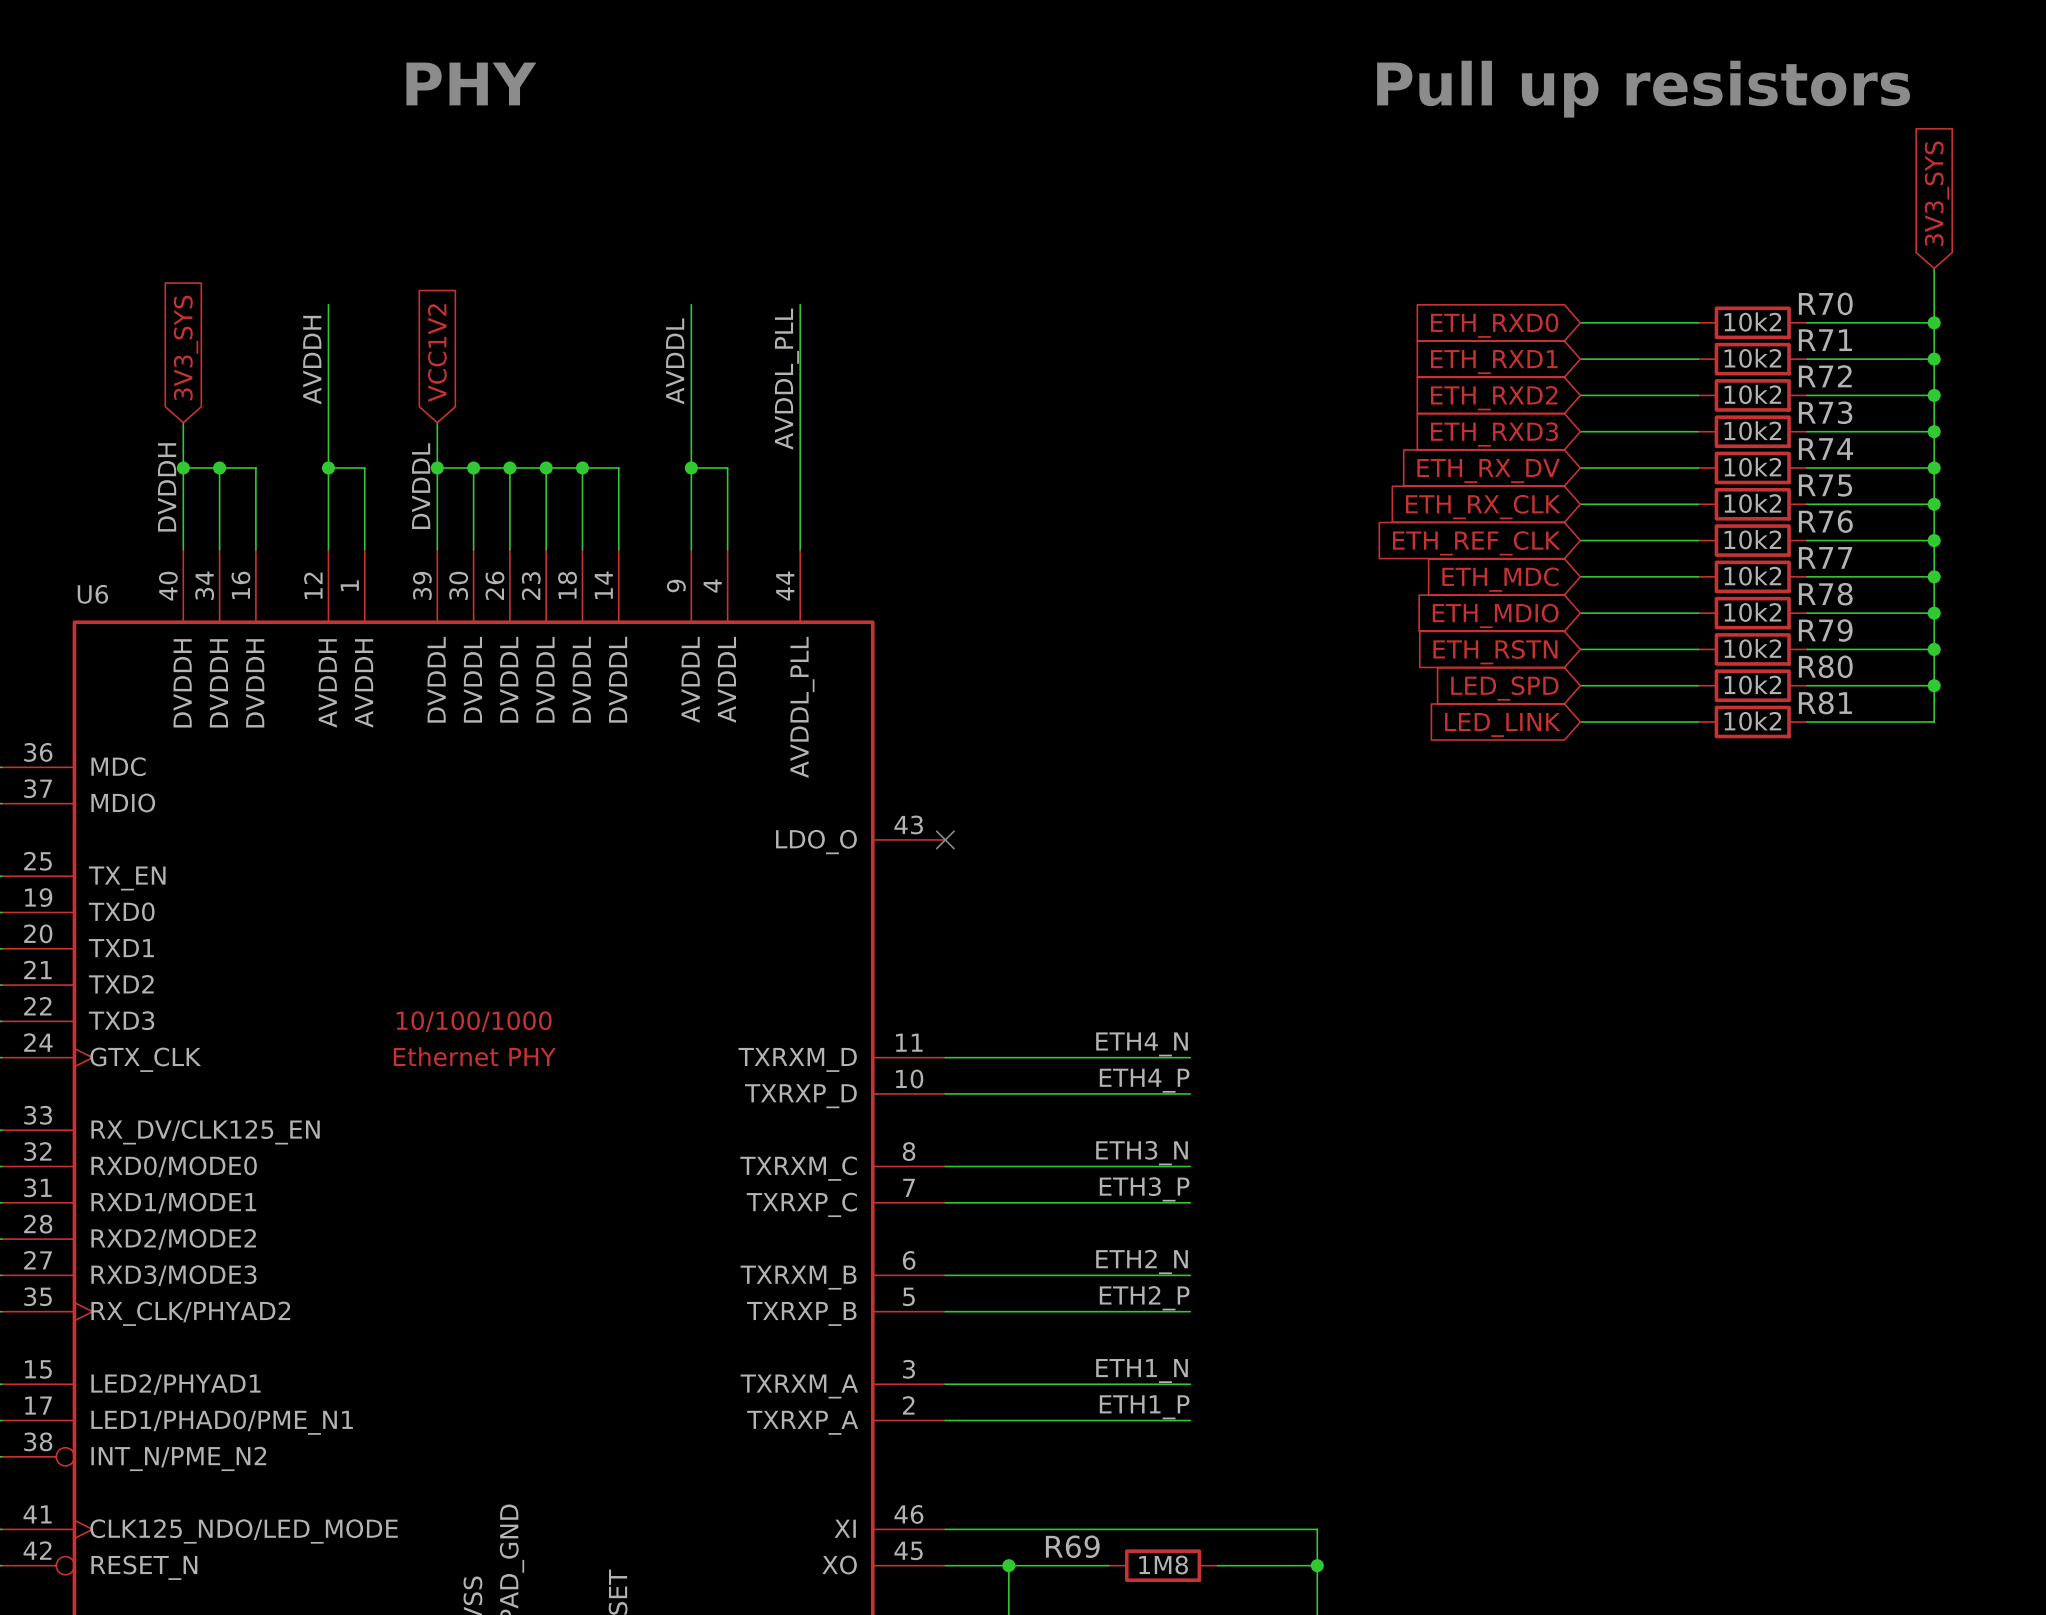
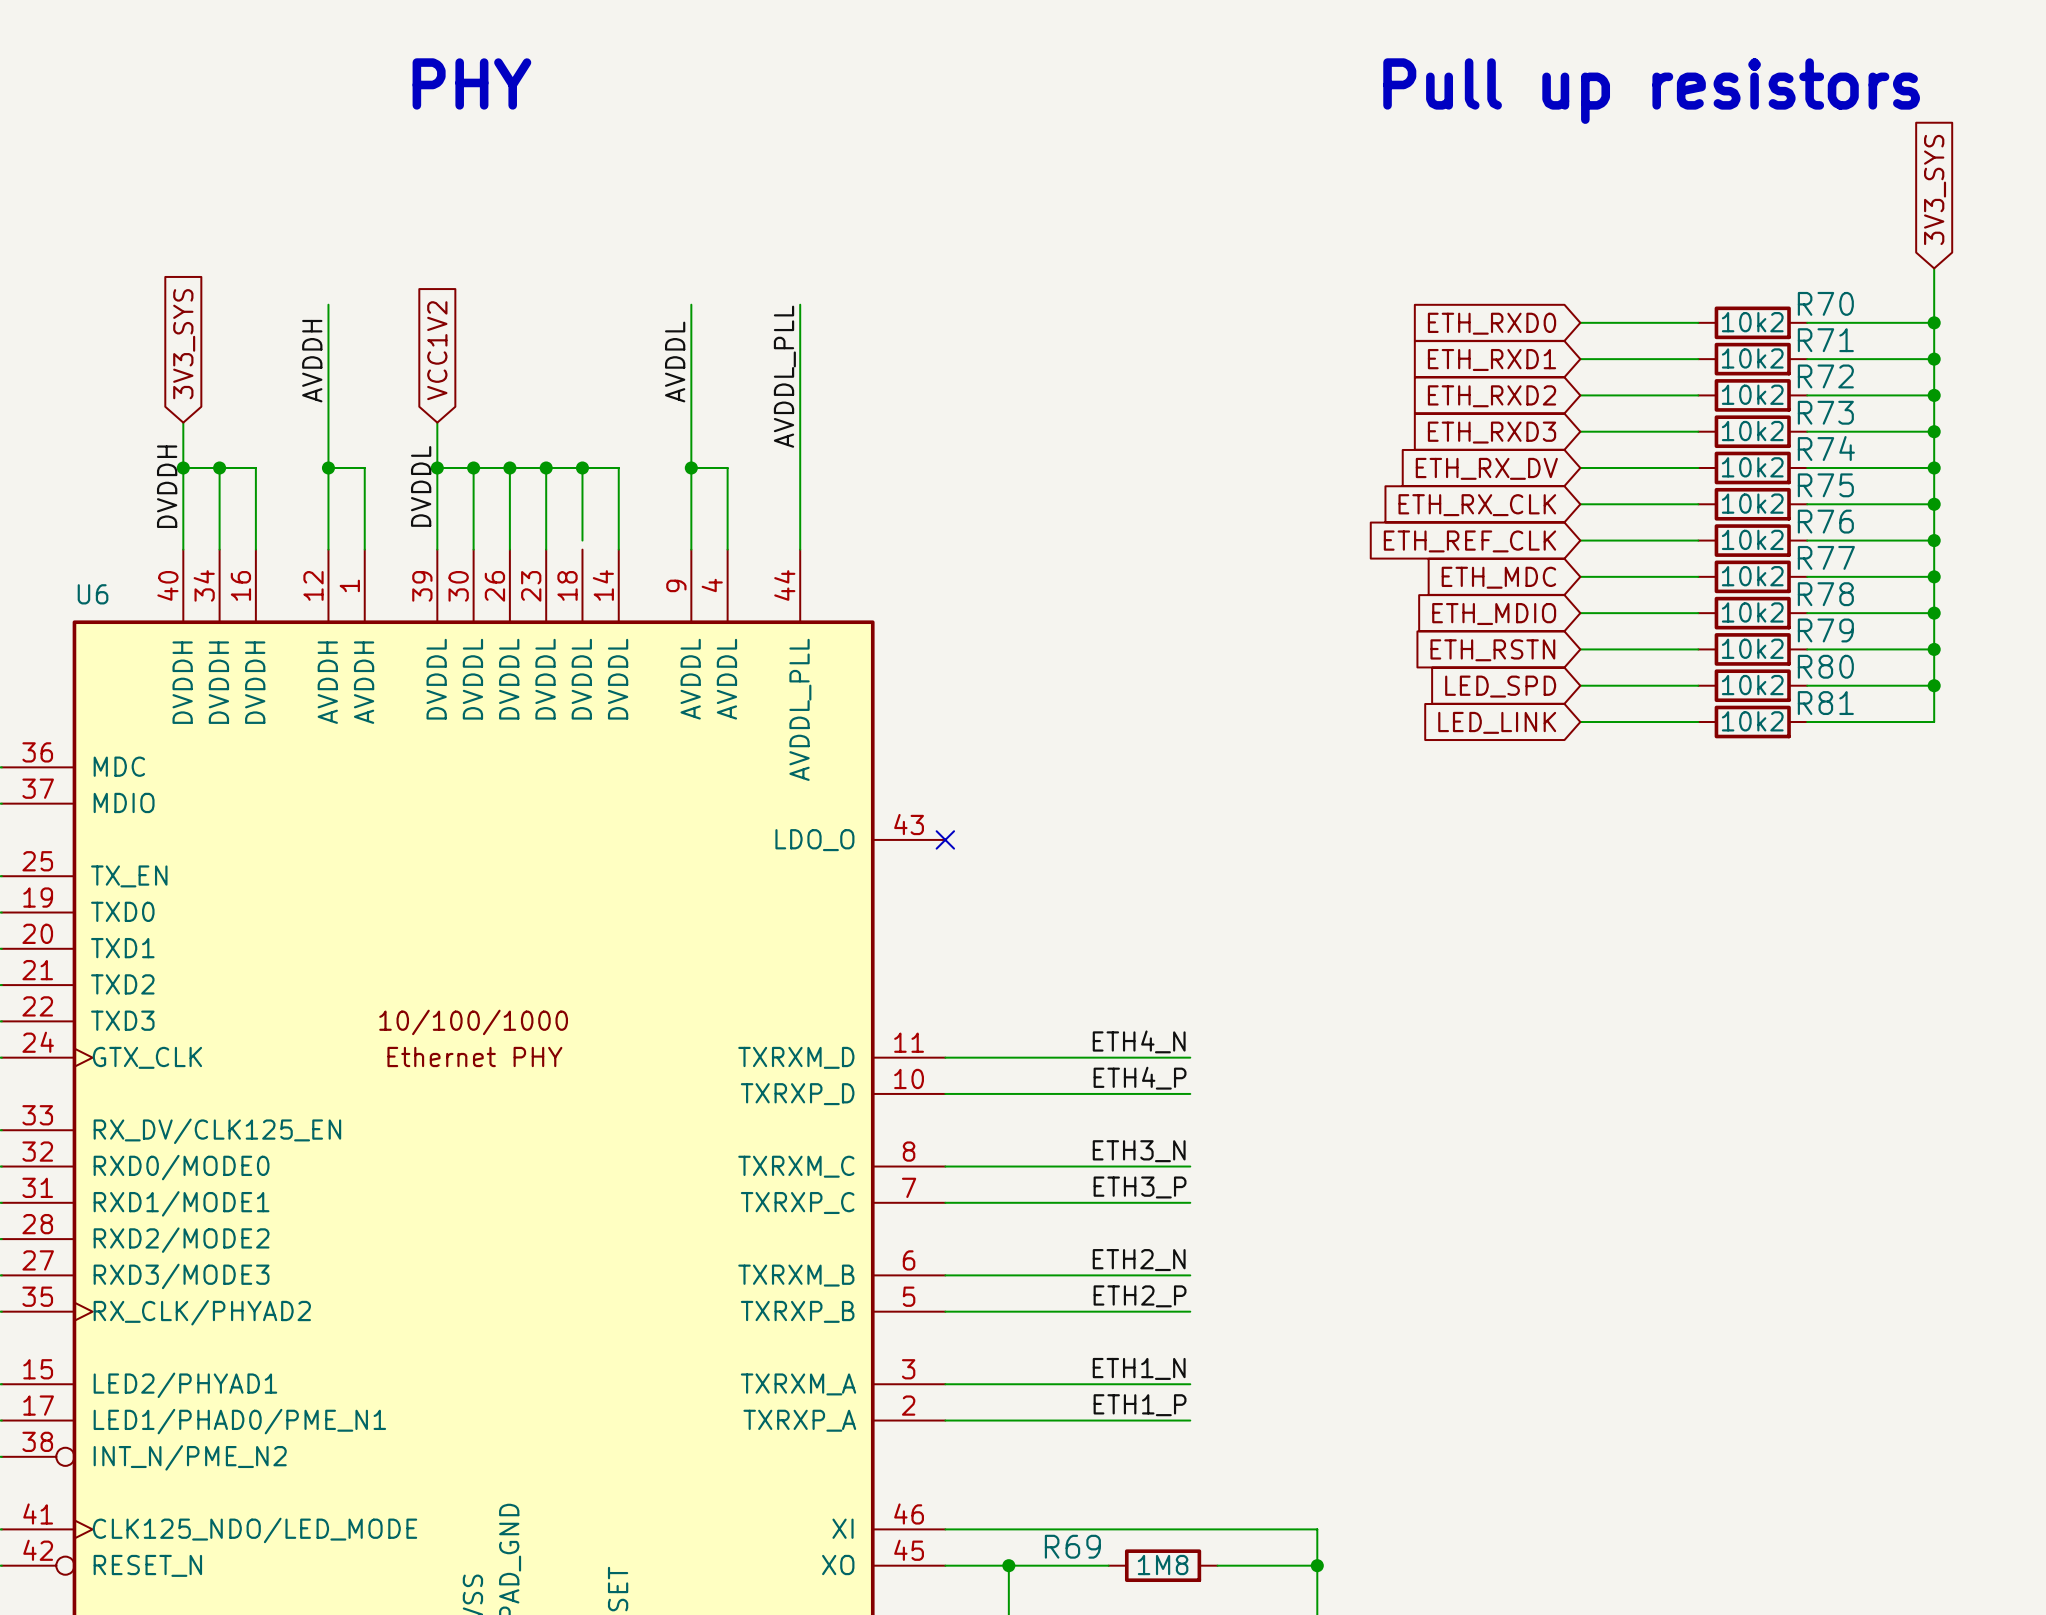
wire: (582, 540) (582, 549) -> none

